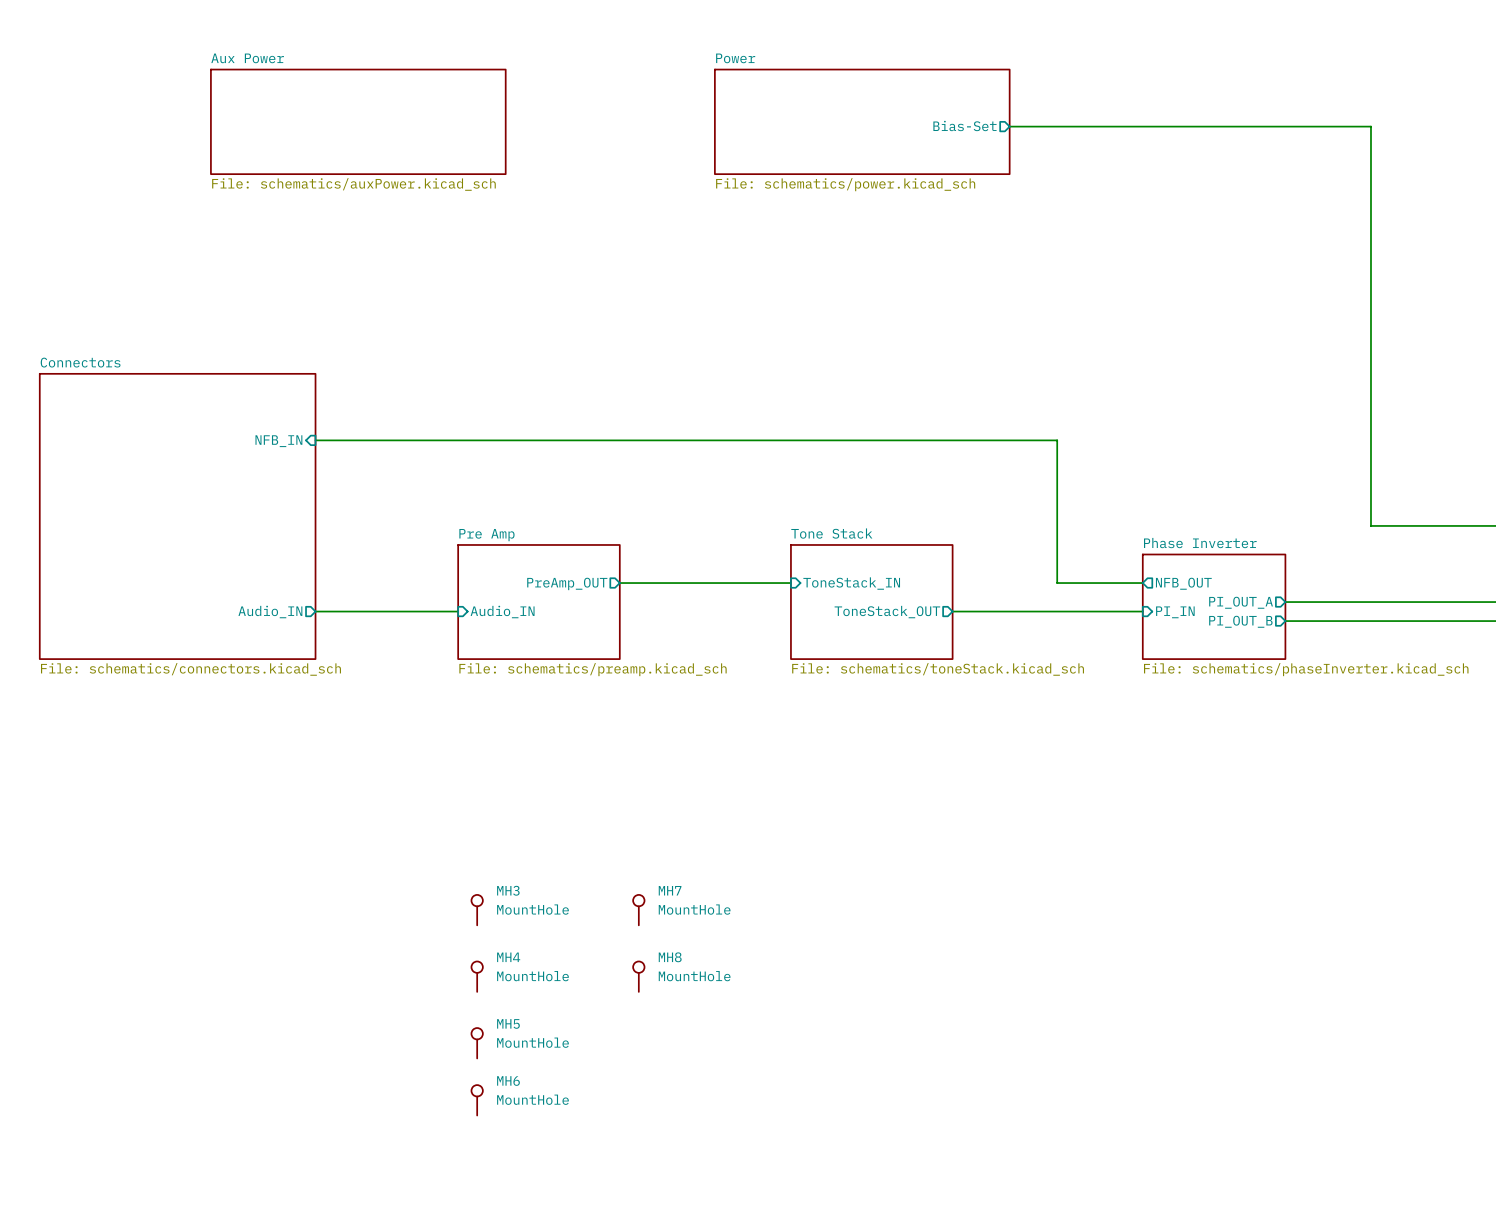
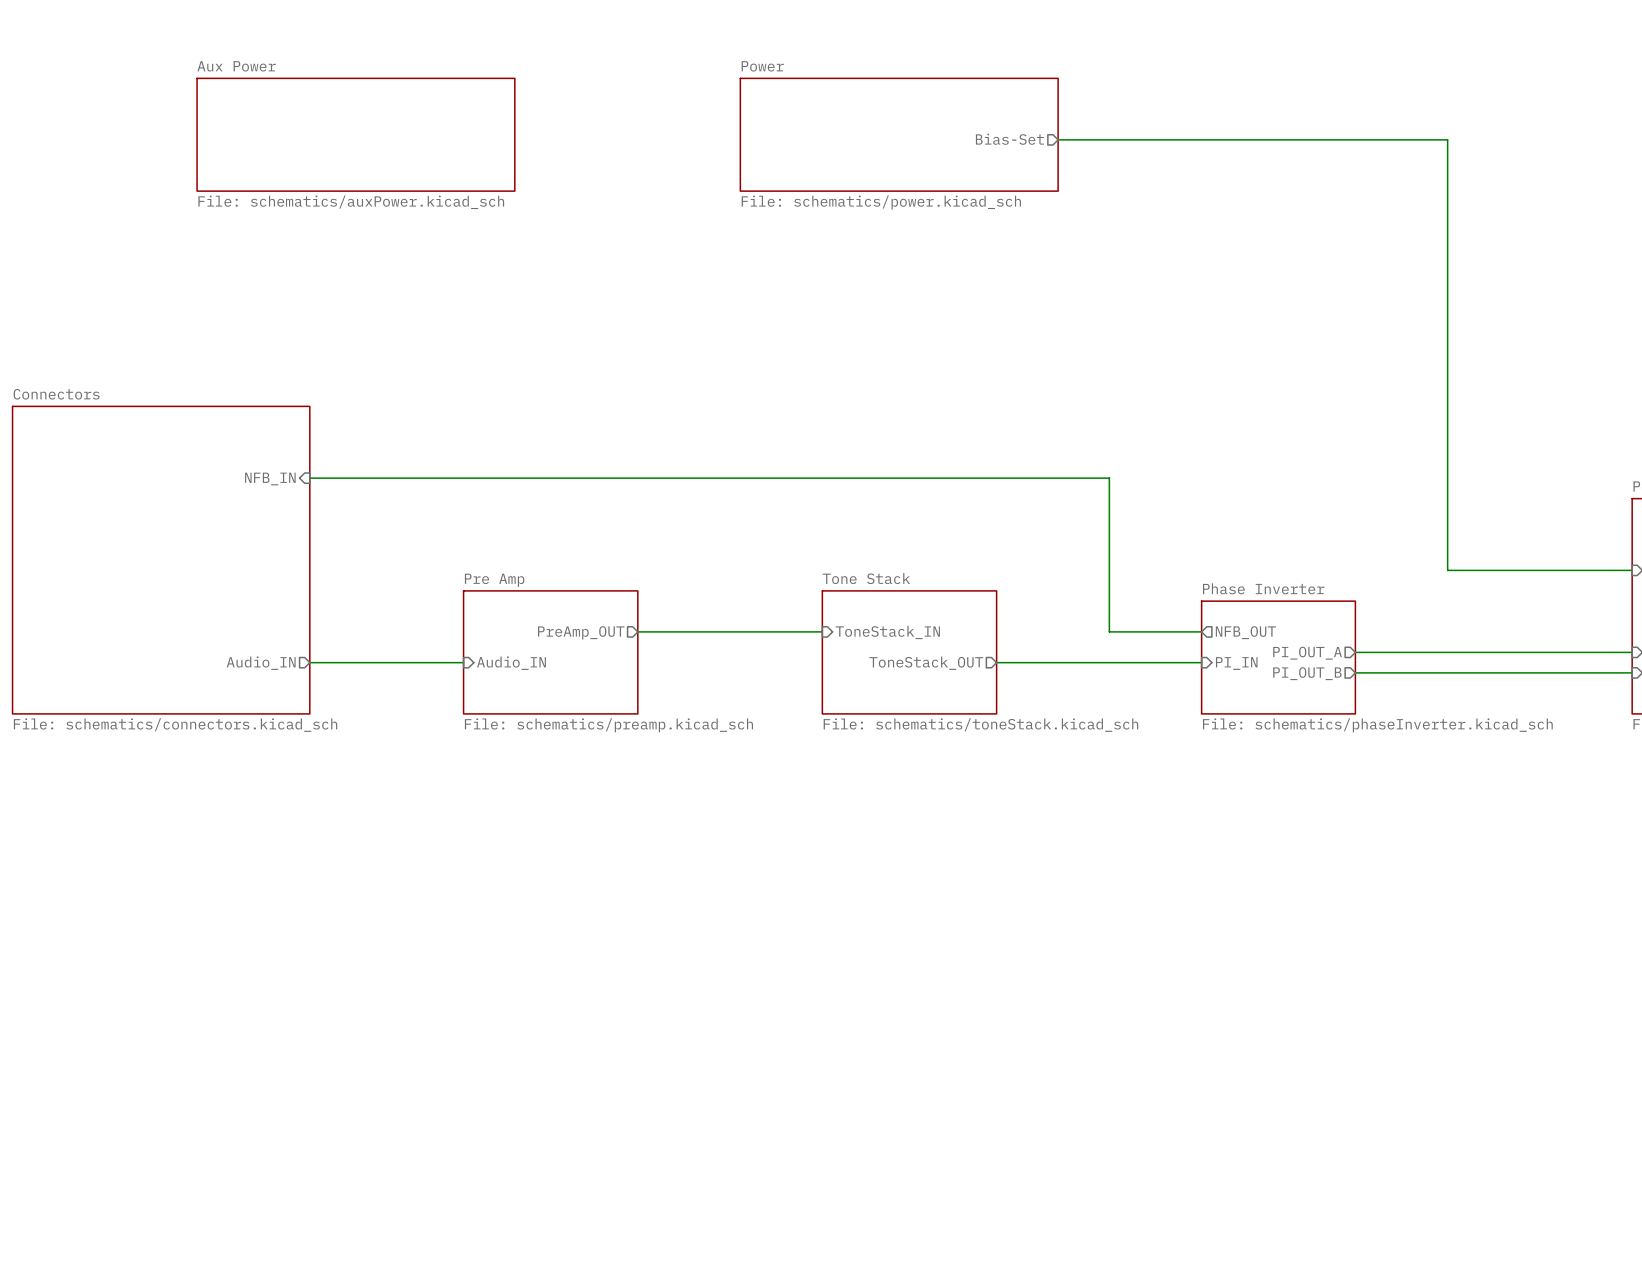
MH3: MountHole (477, 910) -> none
MH7: MountHole (638, 910) -> none
MH4: MountHole (477, 976) -> none
MH8: MountHole (638, 976) -> none
MH5: MountHole (477, 1043) -> none
MH6: MountHole (477, 1100) -> none

